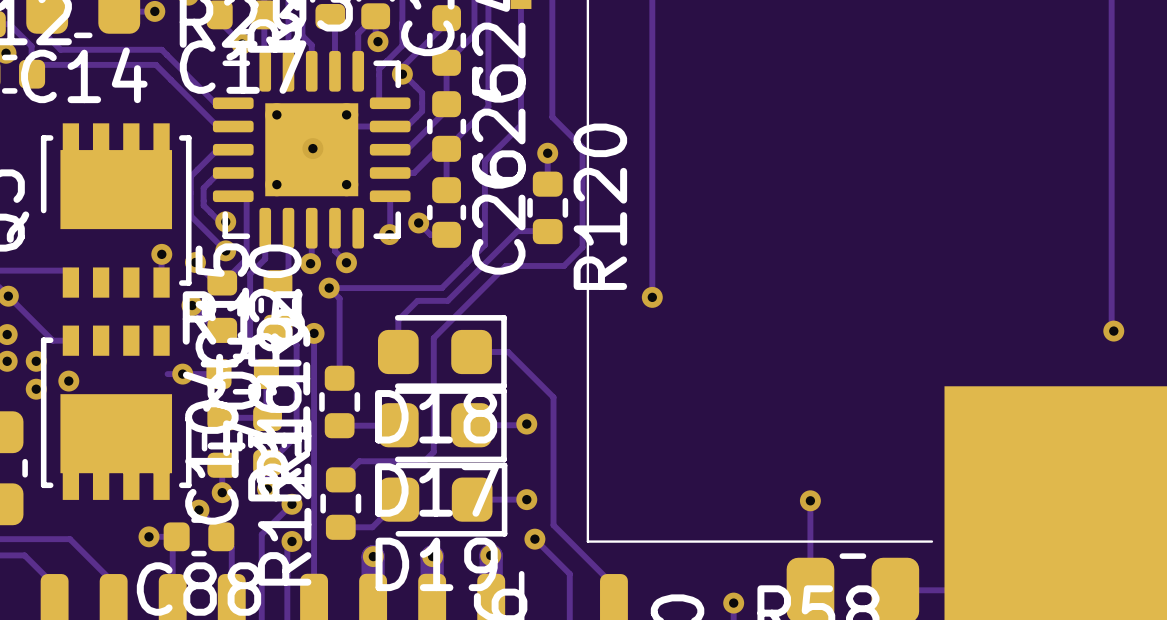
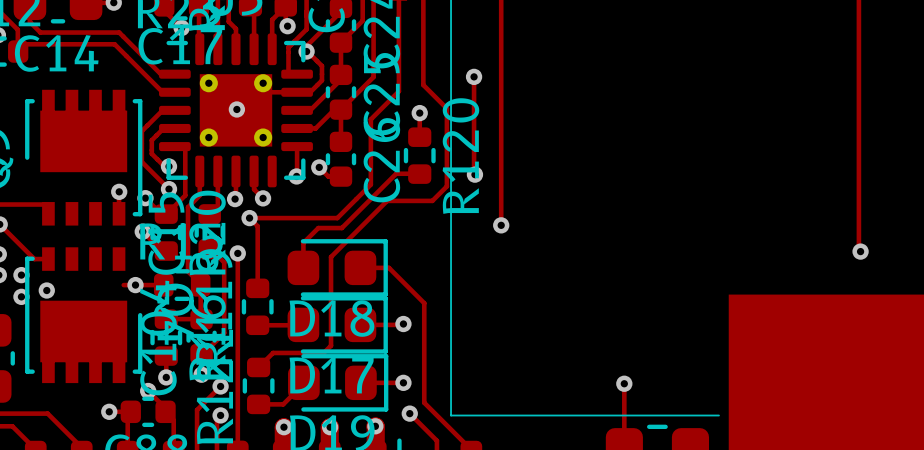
track: none -> (474, 76) (474, 174)
via: none -> (474, 76)
via: none -> (474, 174)

